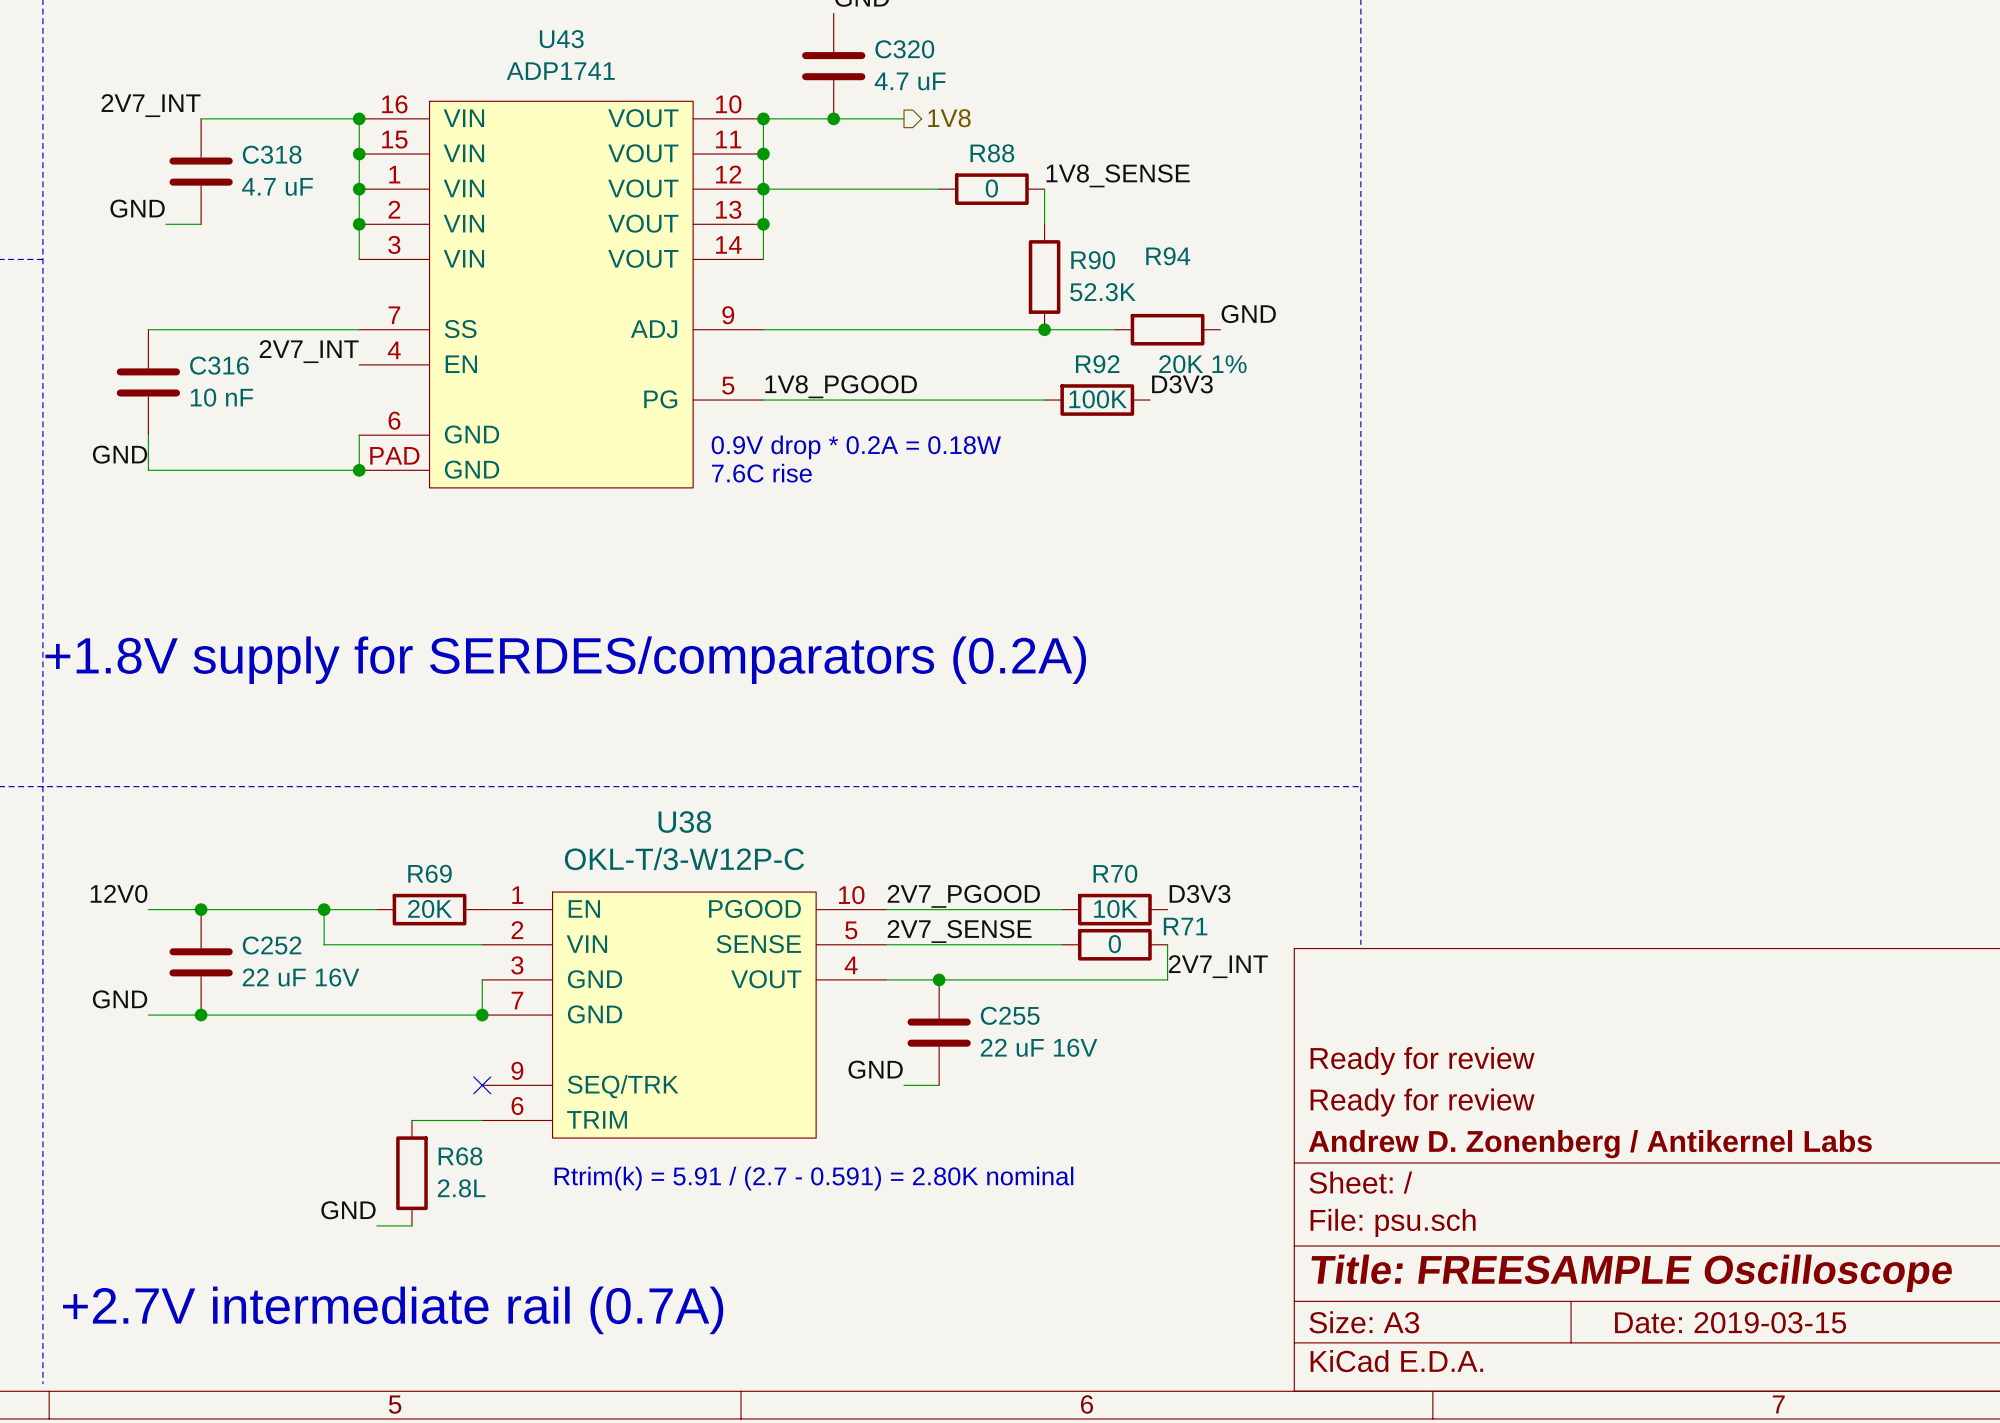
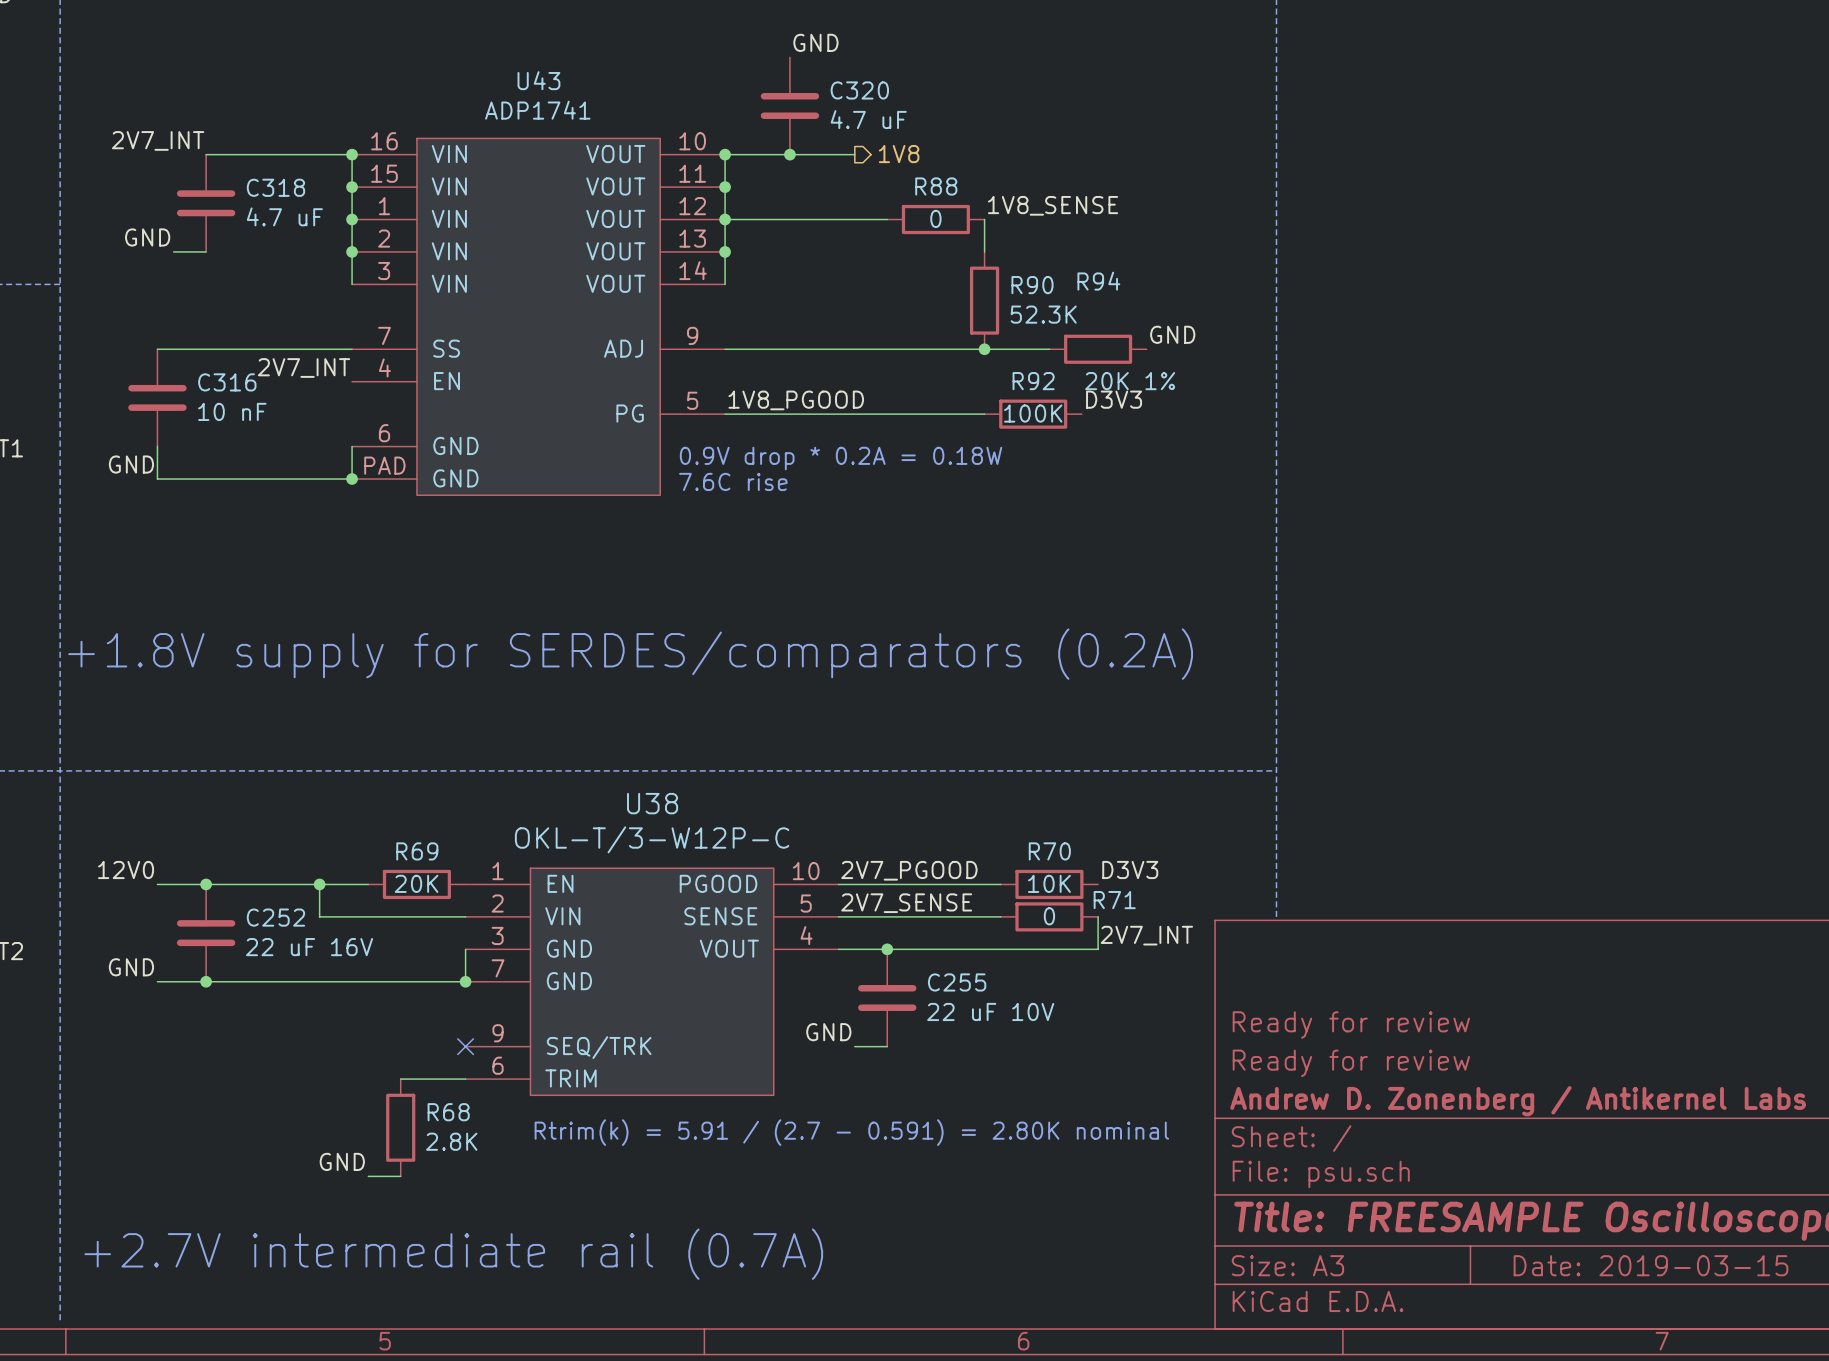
C255 value: 22 uF 16V (1039, 1047) -> 22 uF 10V (990, 1011)
R68 value: 2.8L (461, 1188) -> 2.8K (451, 1141)

